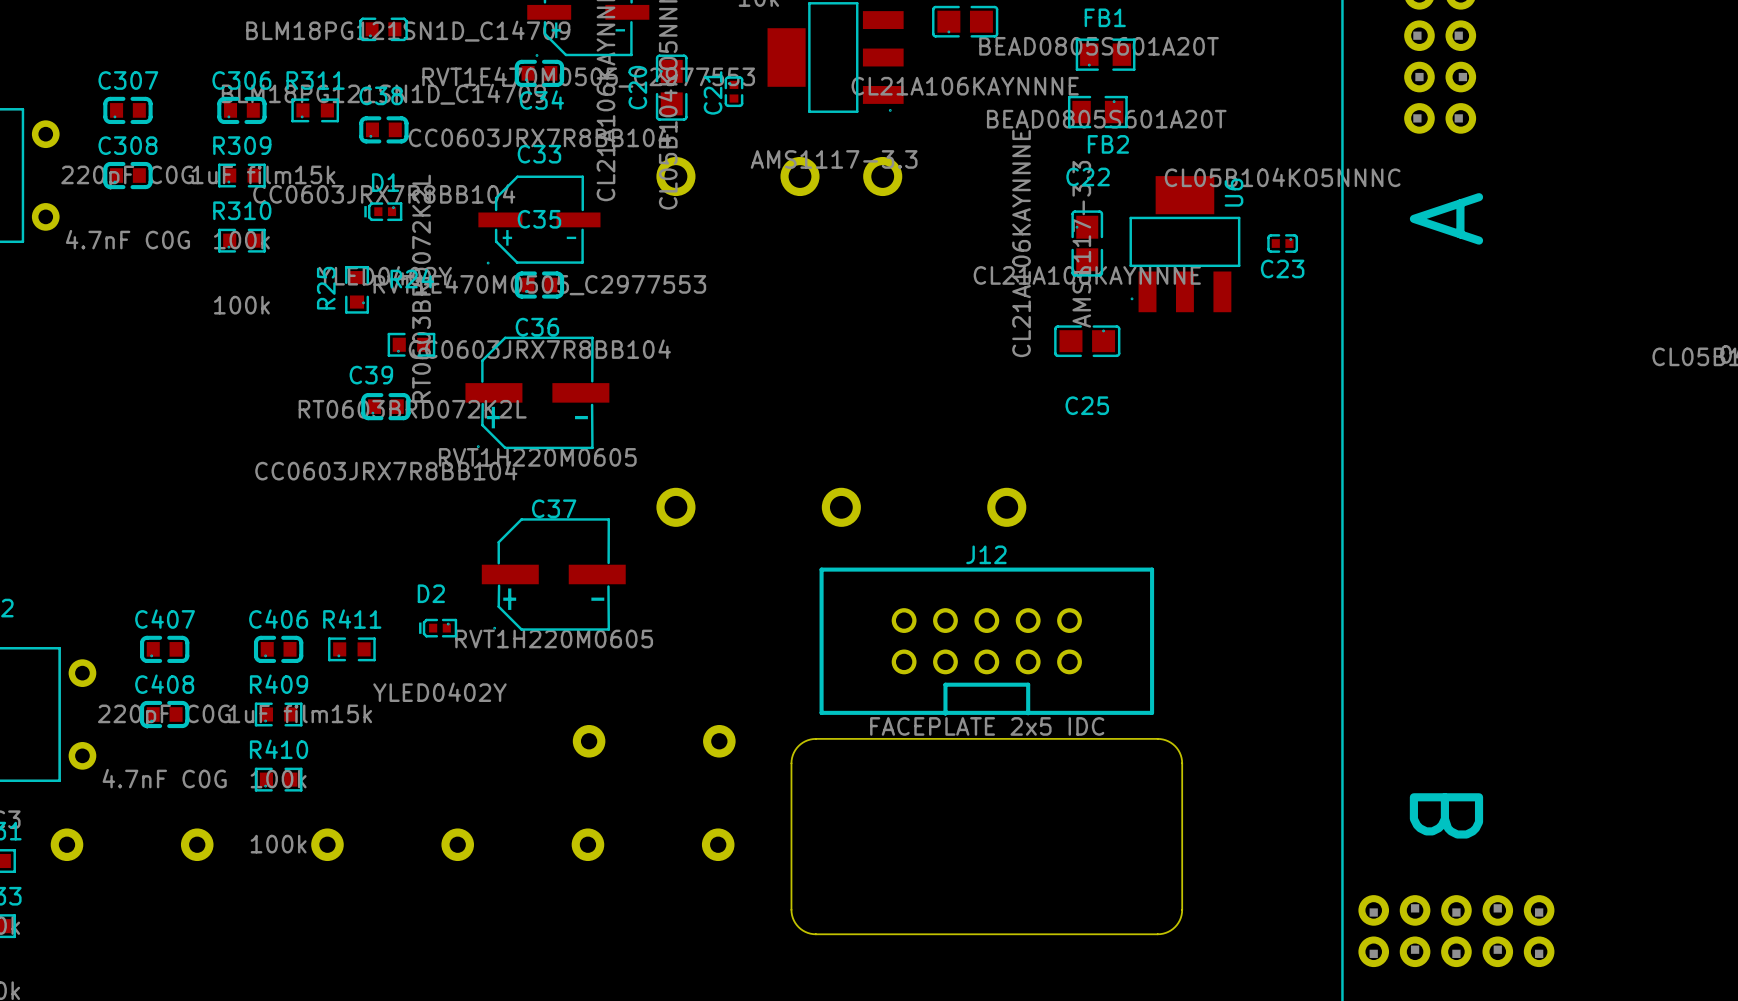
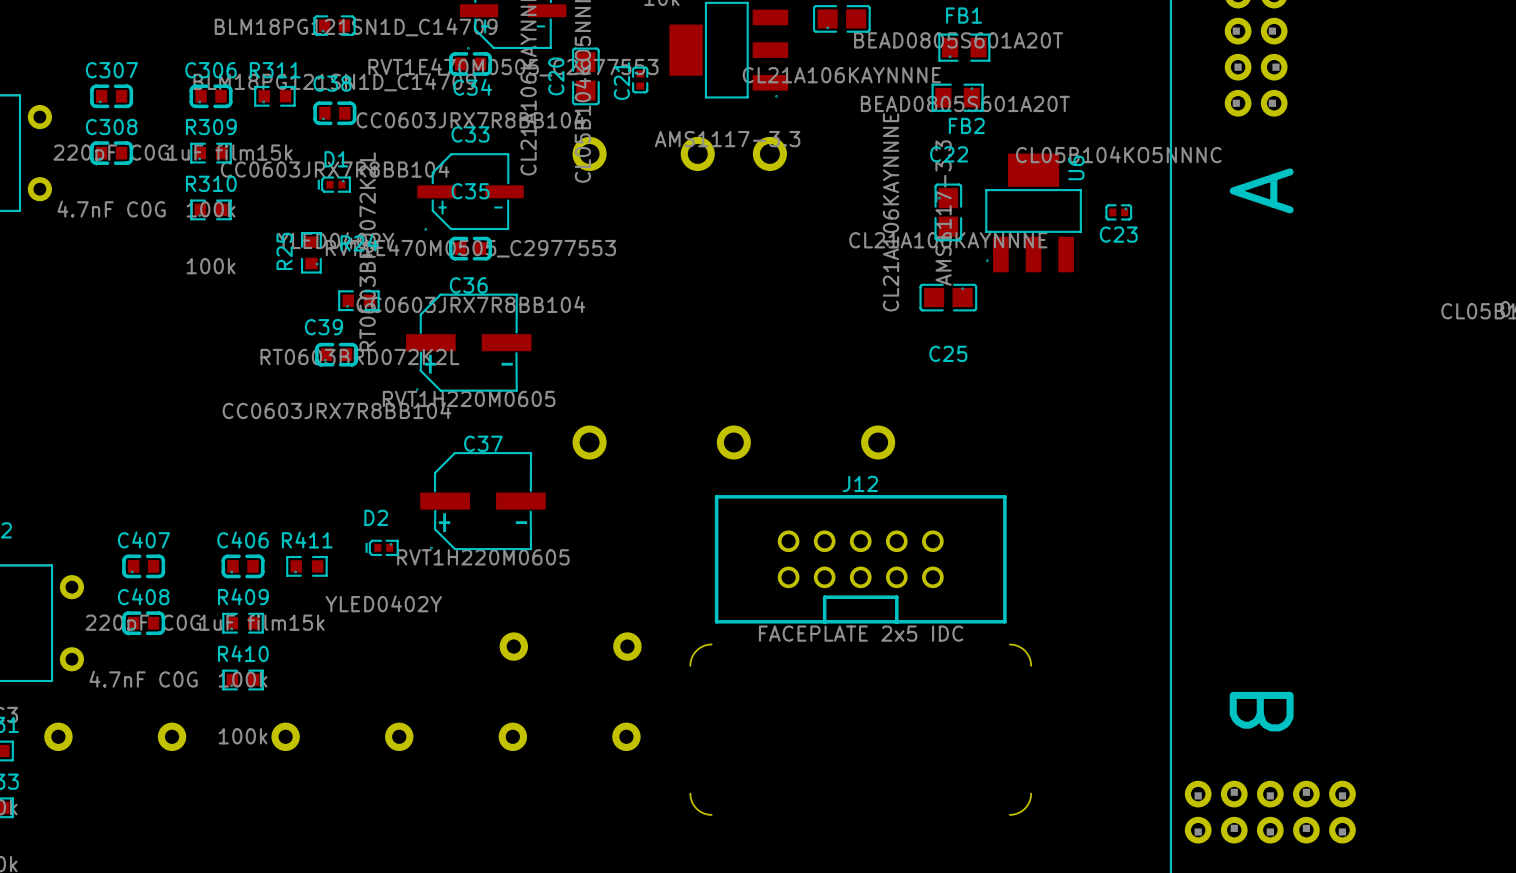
board edge: (815, 738) (1157, 738) -> none
board edge: (791, 763) (791, 909) -> none
board edge: (1182, 763) (1182, 909) -> none
board edge: (815, 934) (1157, 934) -> none

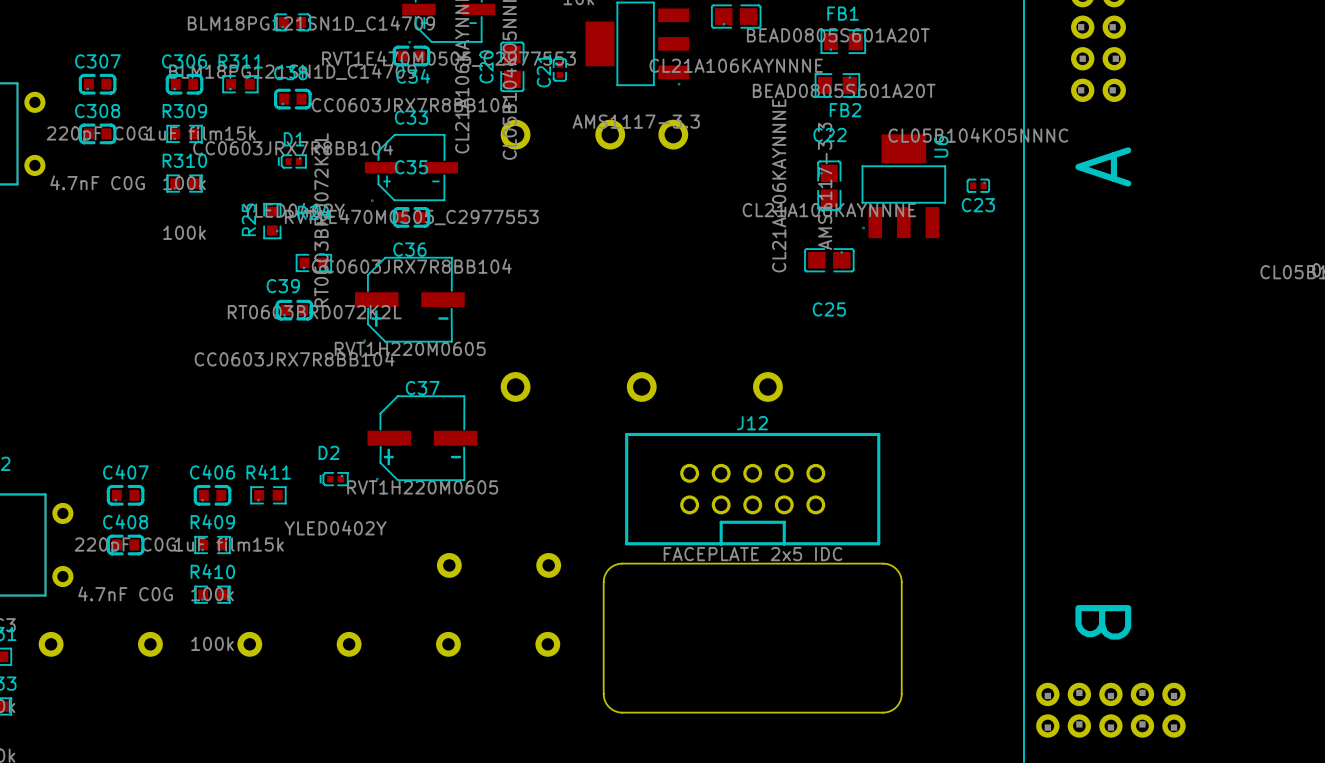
board edge: none -> (622, 563) (883, 563)
board edge: none -> (603, 582) (603, 694)
board edge: none -> (901, 582) (901, 694)
board edge: none -> (622, 712) (883, 712)

